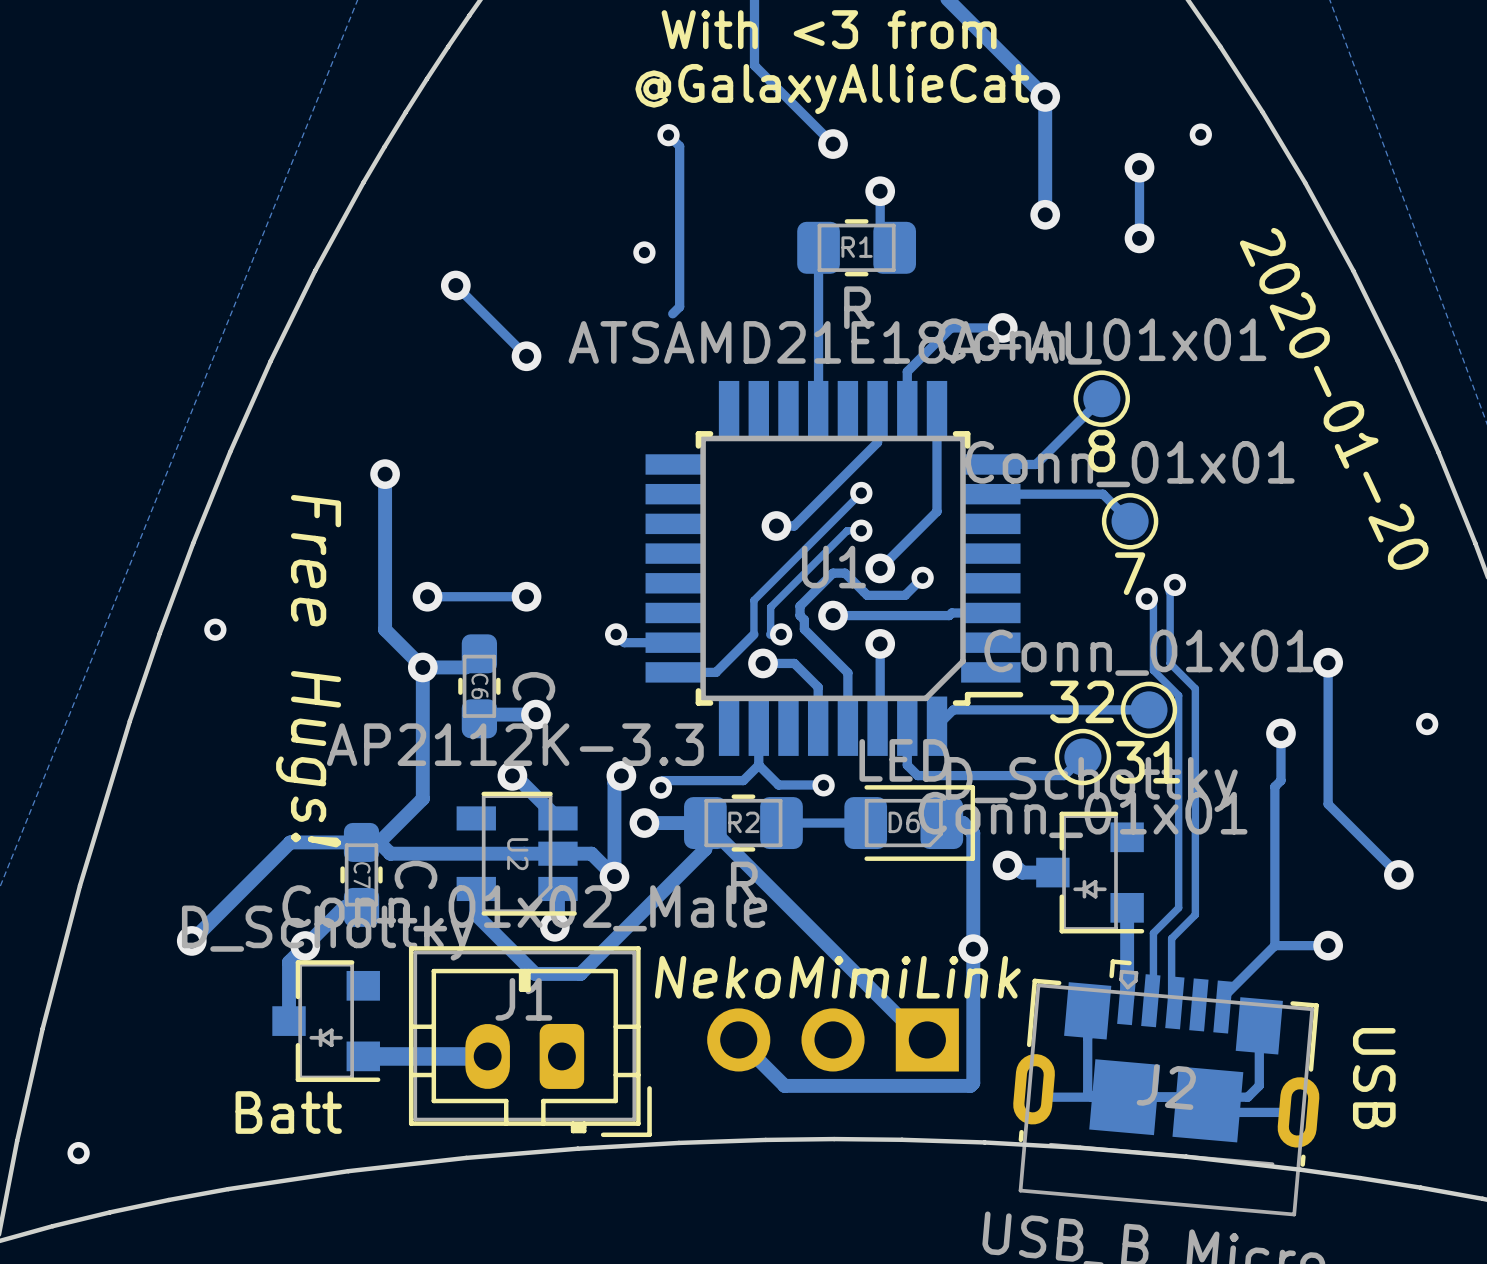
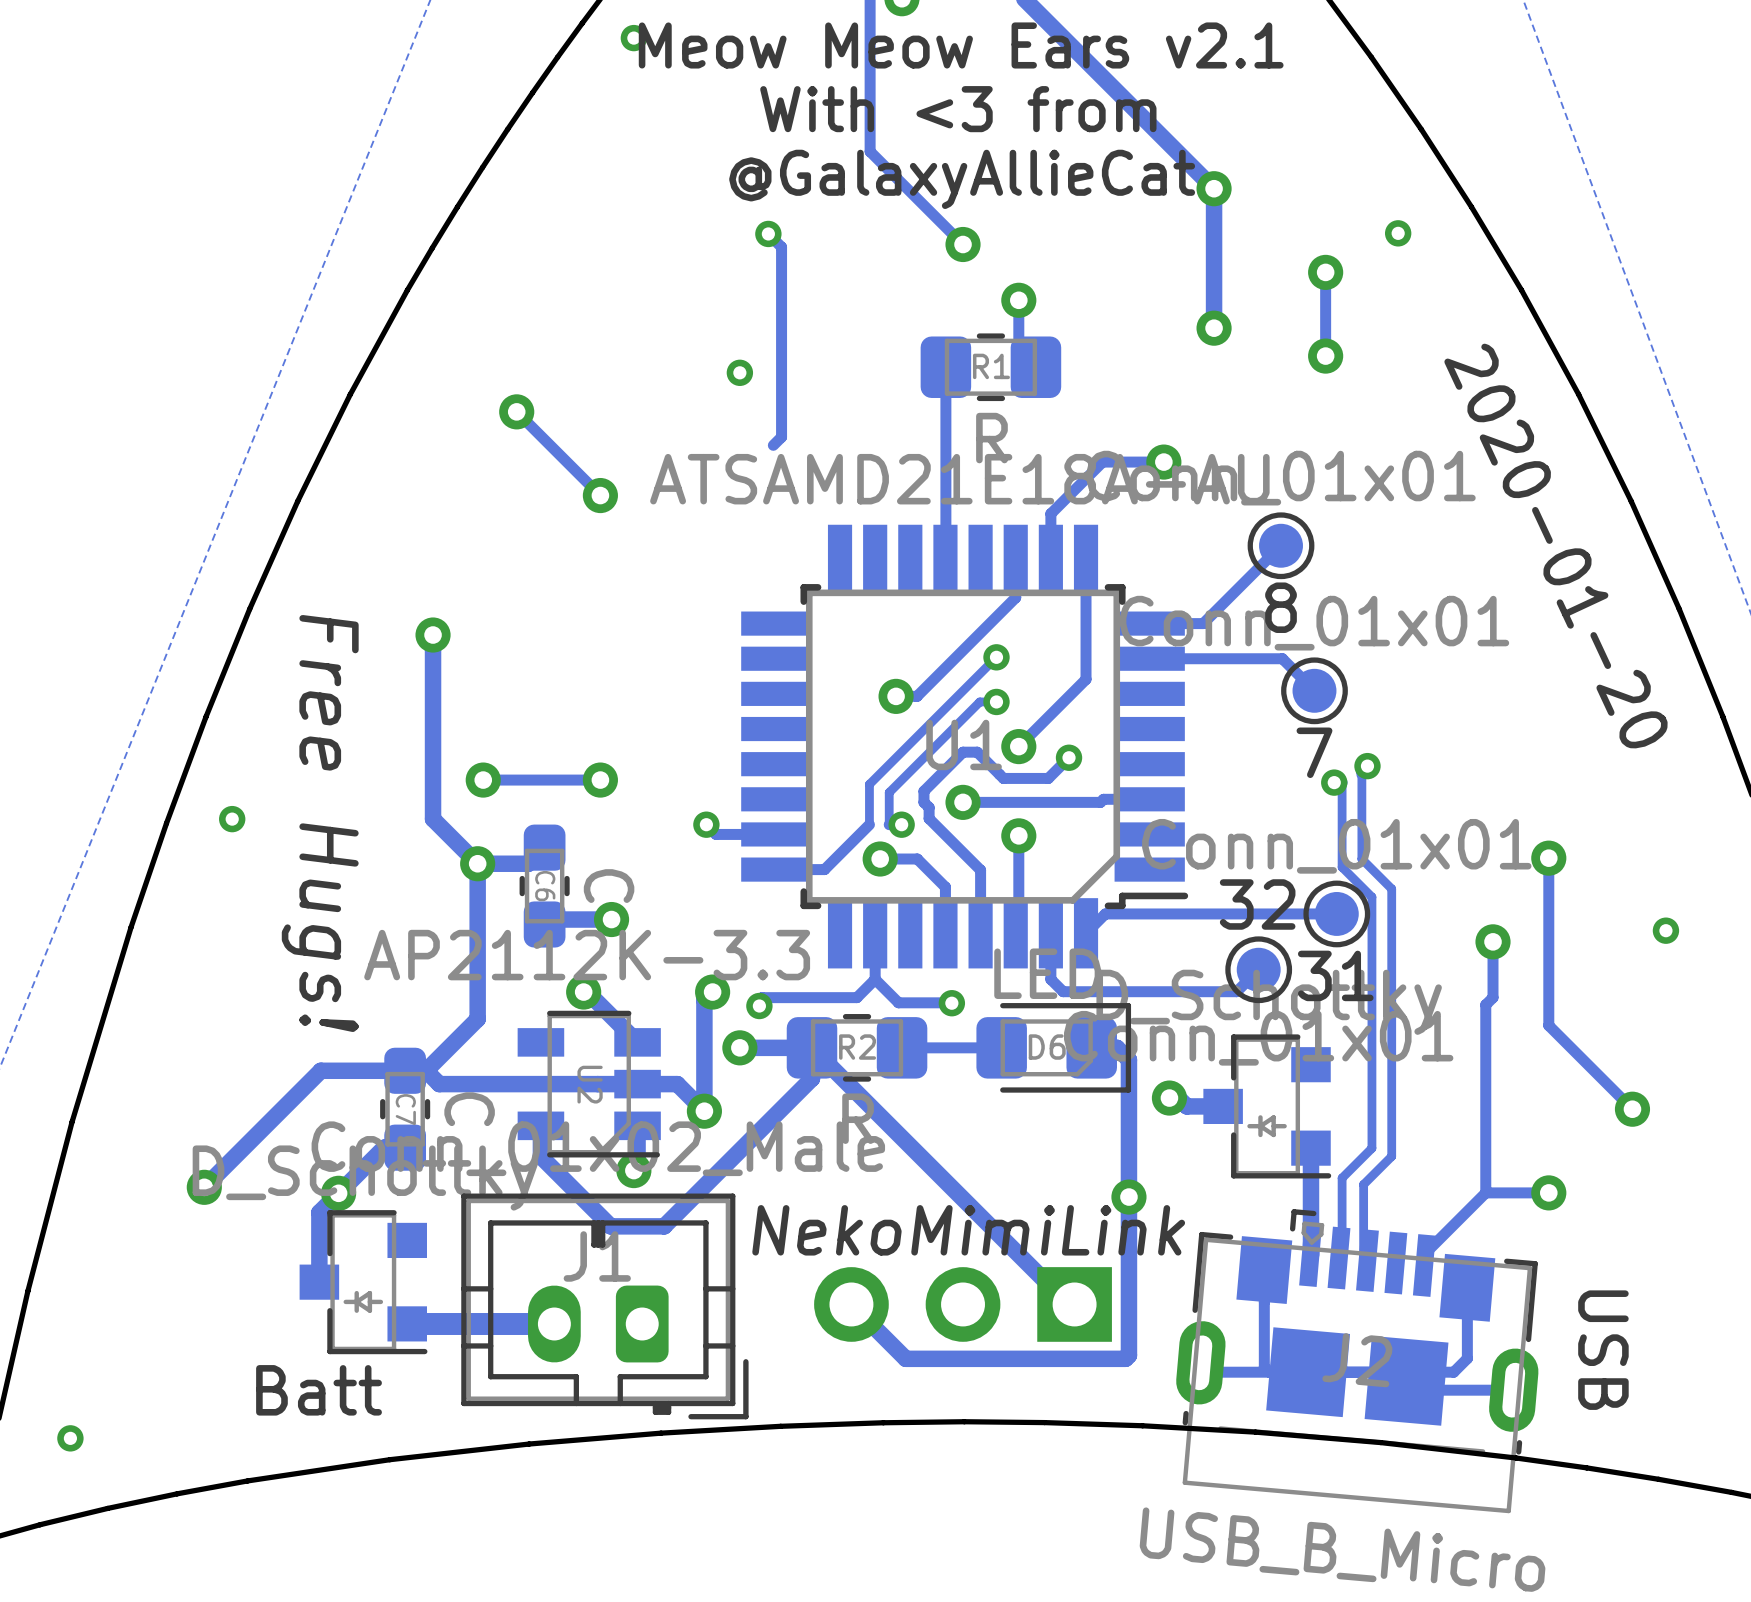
text position: Free Hugs! (308, 671) -> Free Hugs! (320, 823)

